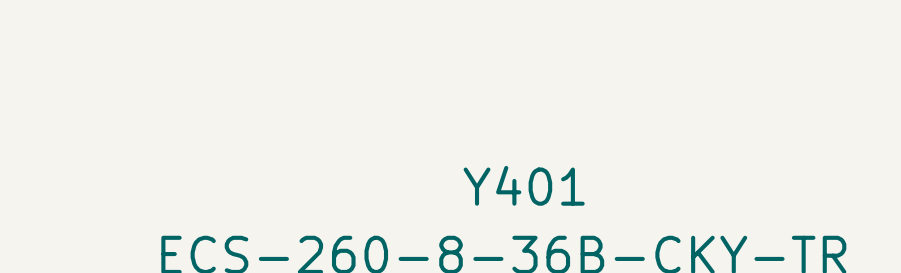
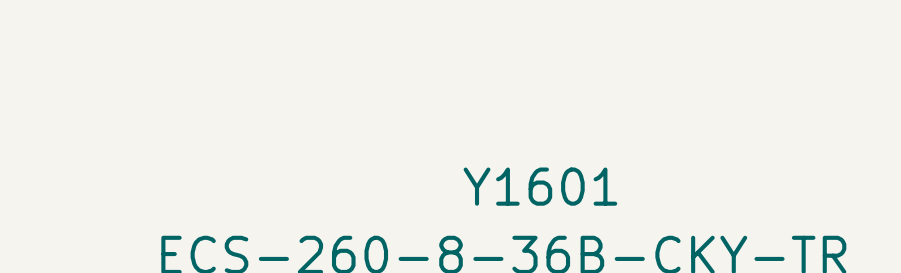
Y401 name: Y401 (524, 185) -> Y1601 (540, 186)

